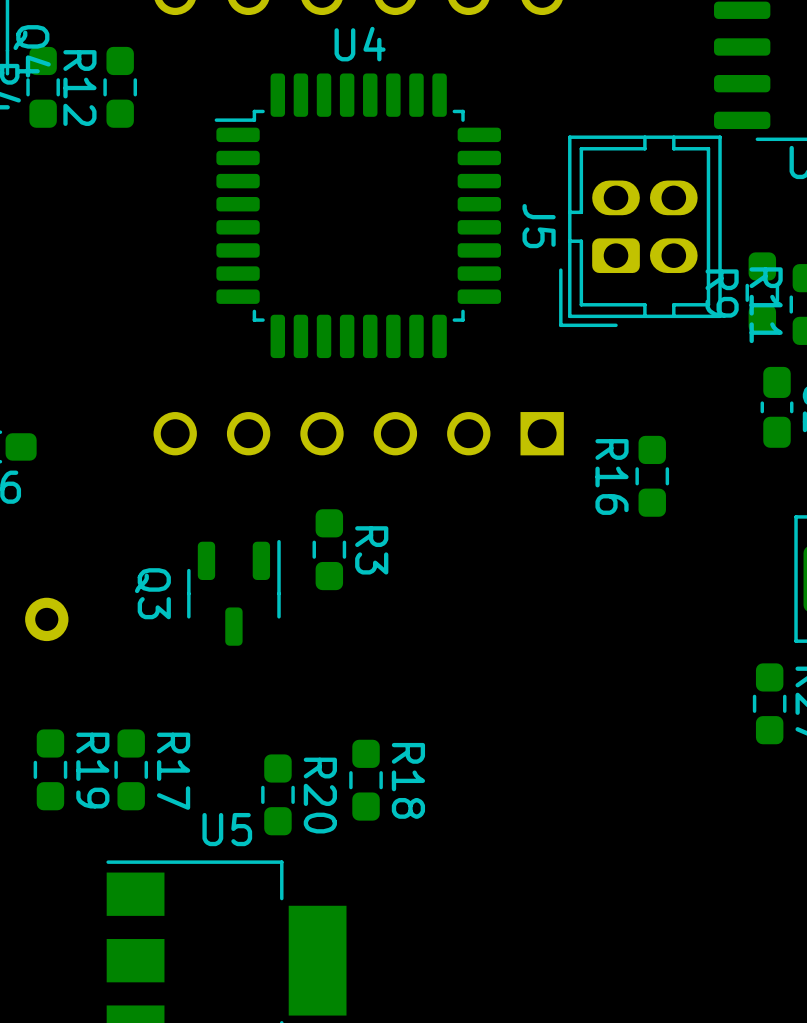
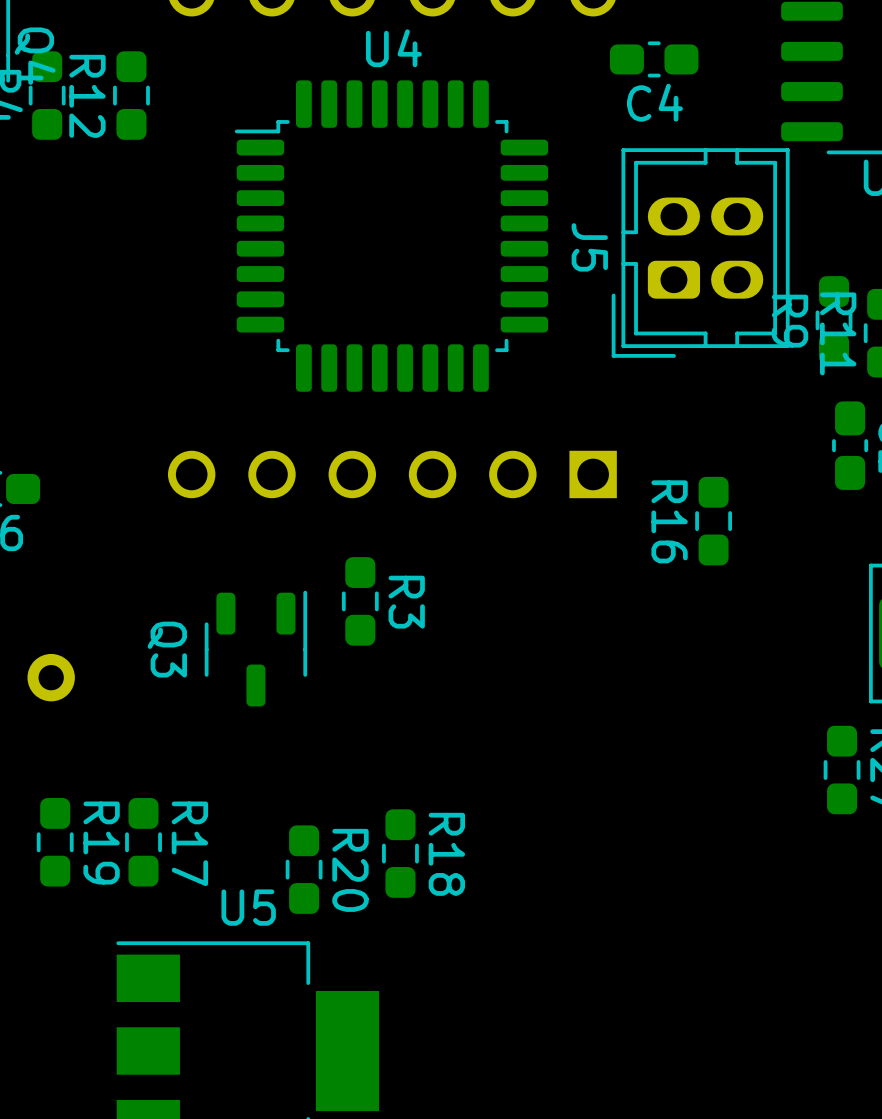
C4: none -> (654, 59)

